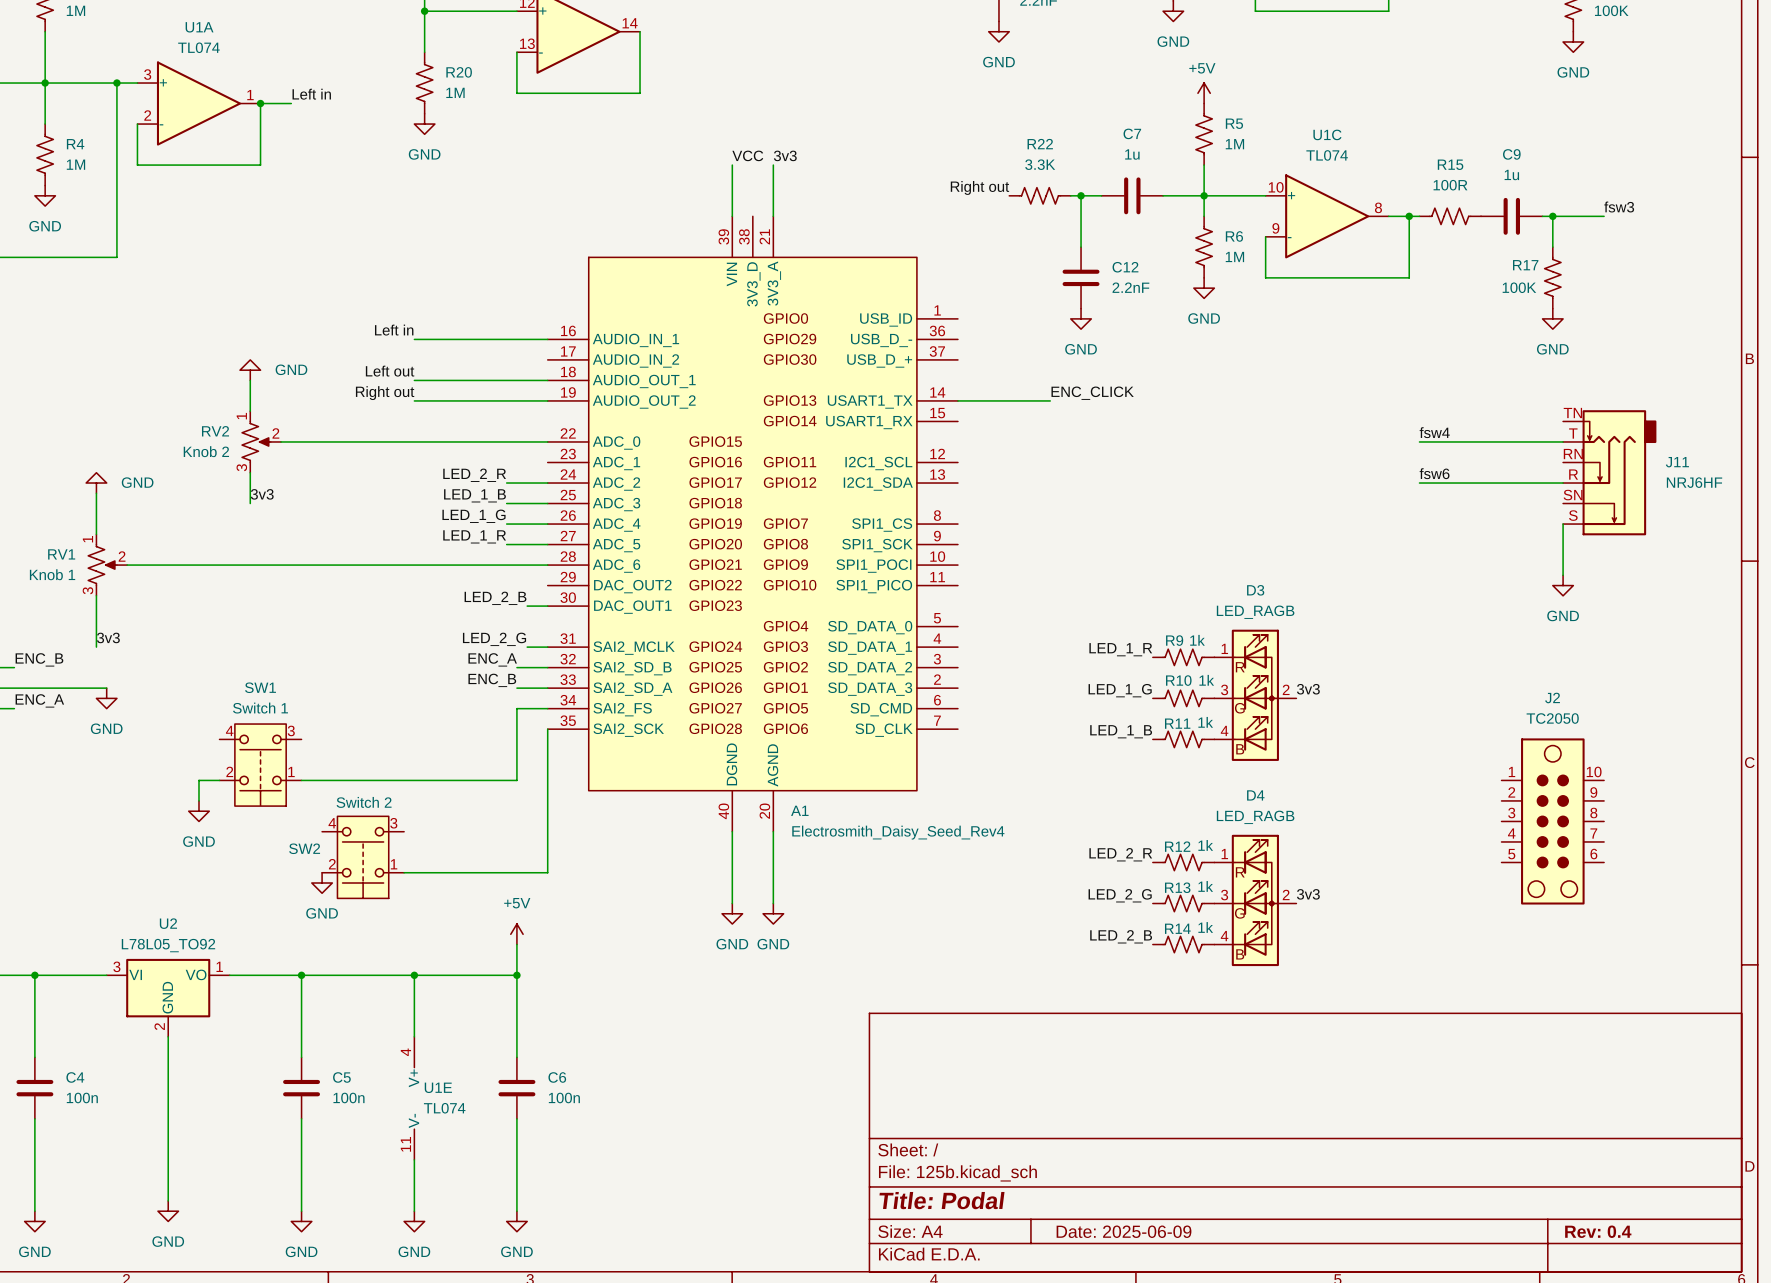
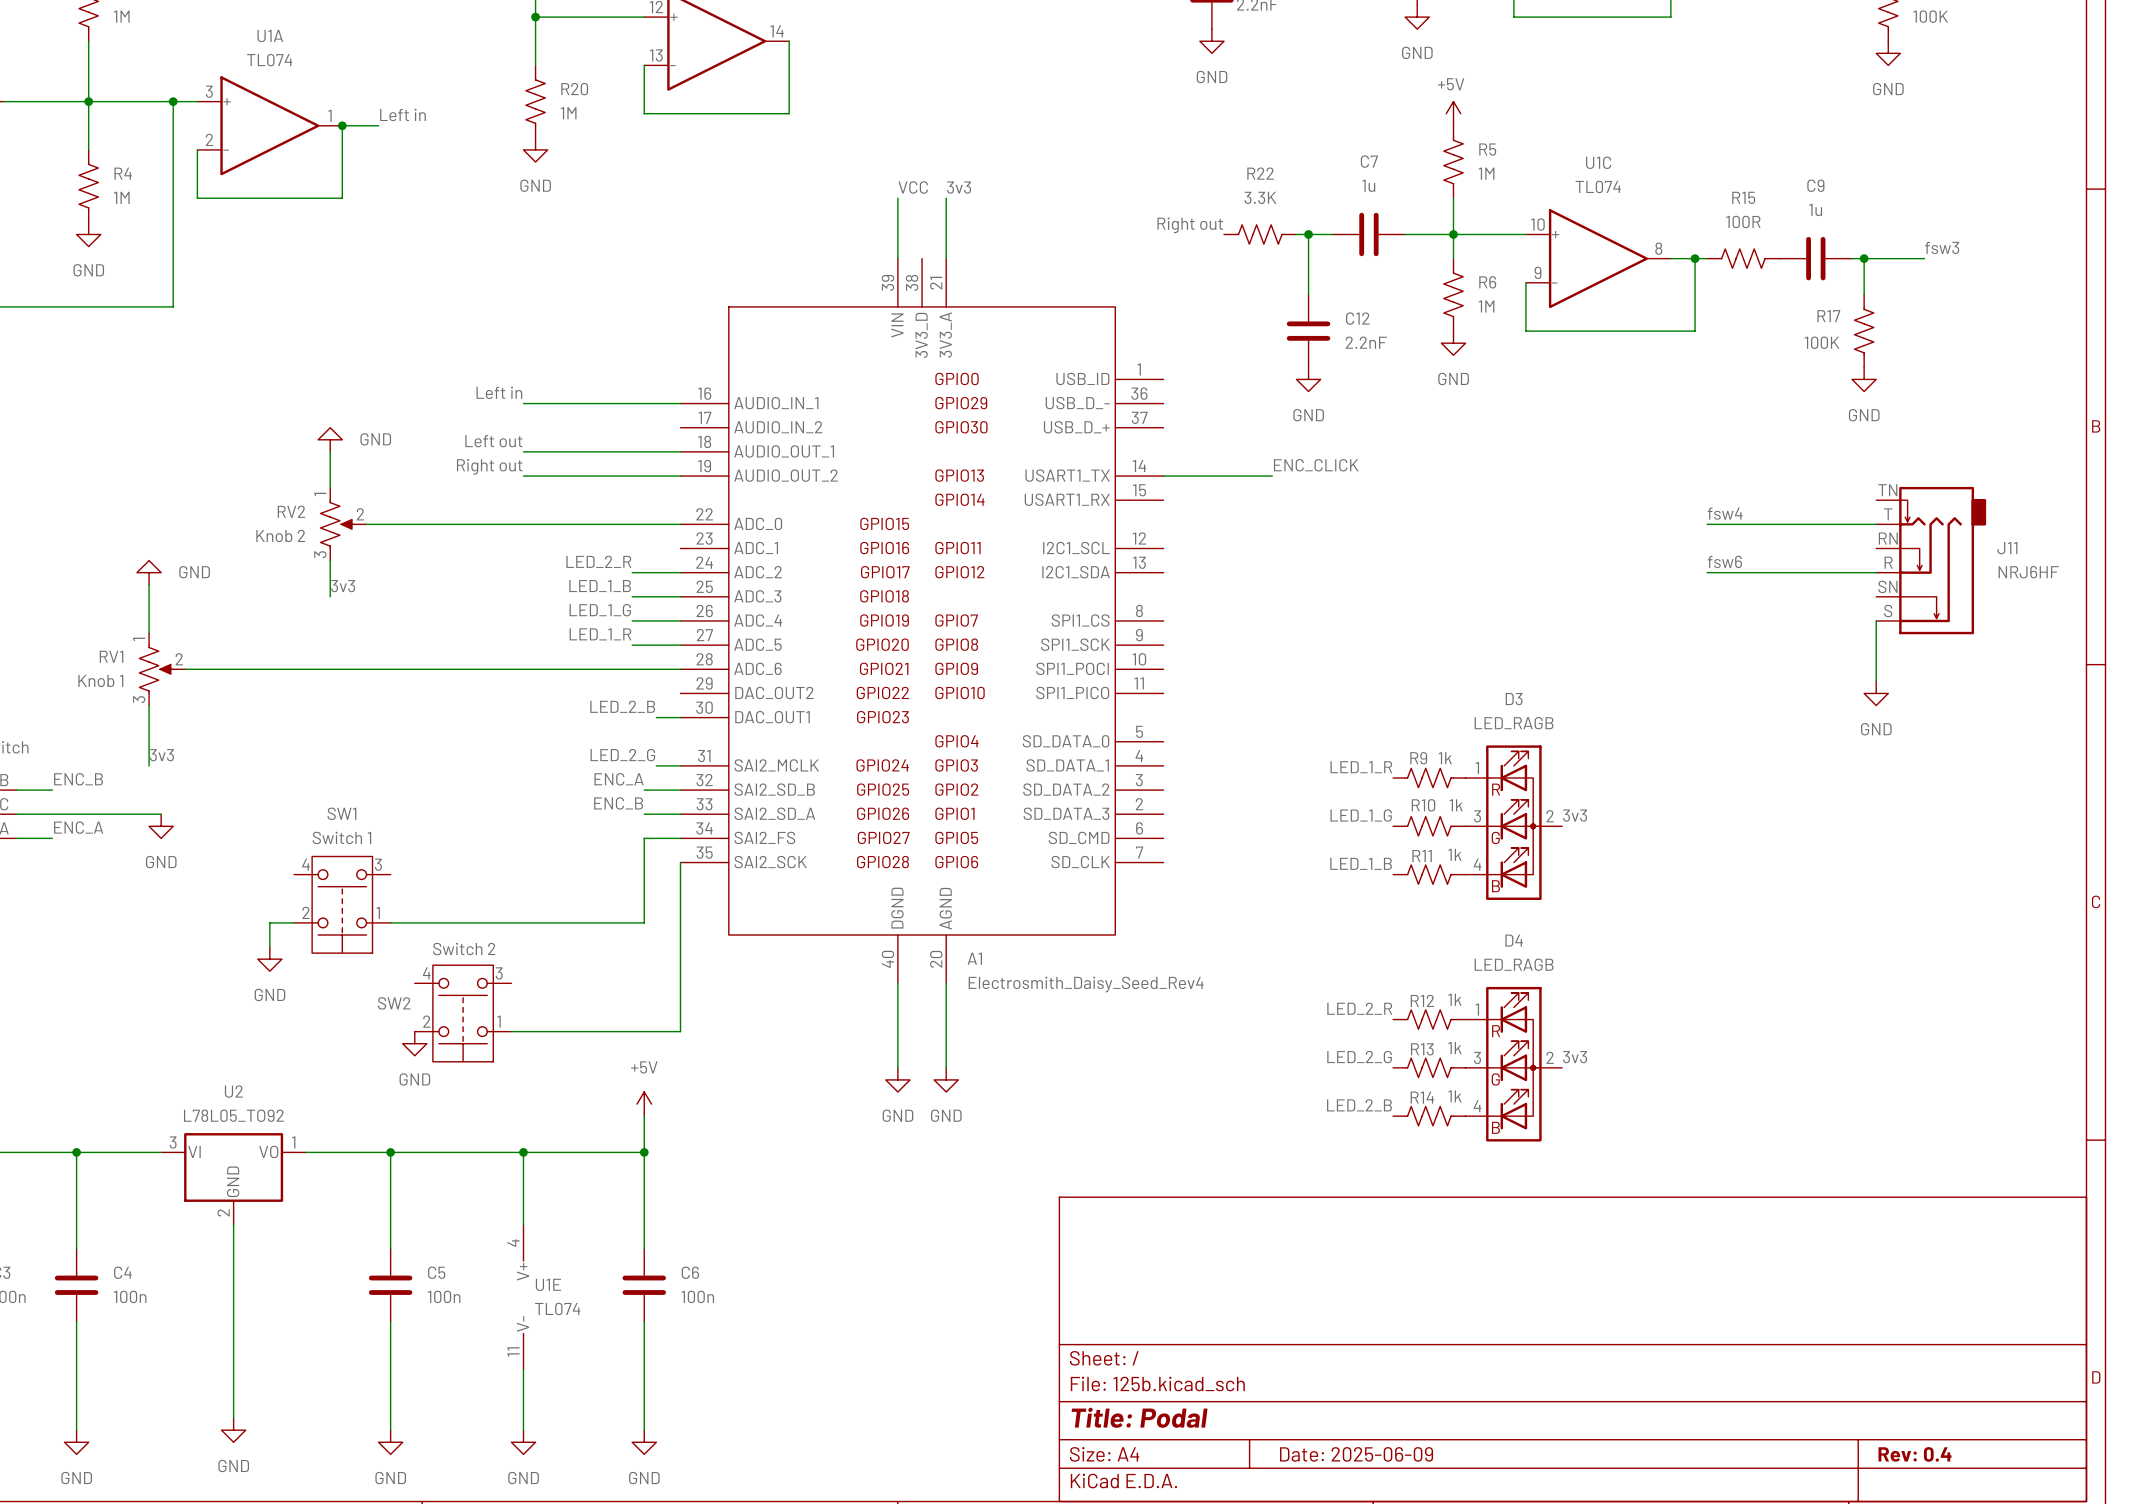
J2: TC2050 (1552, 821) -> none

